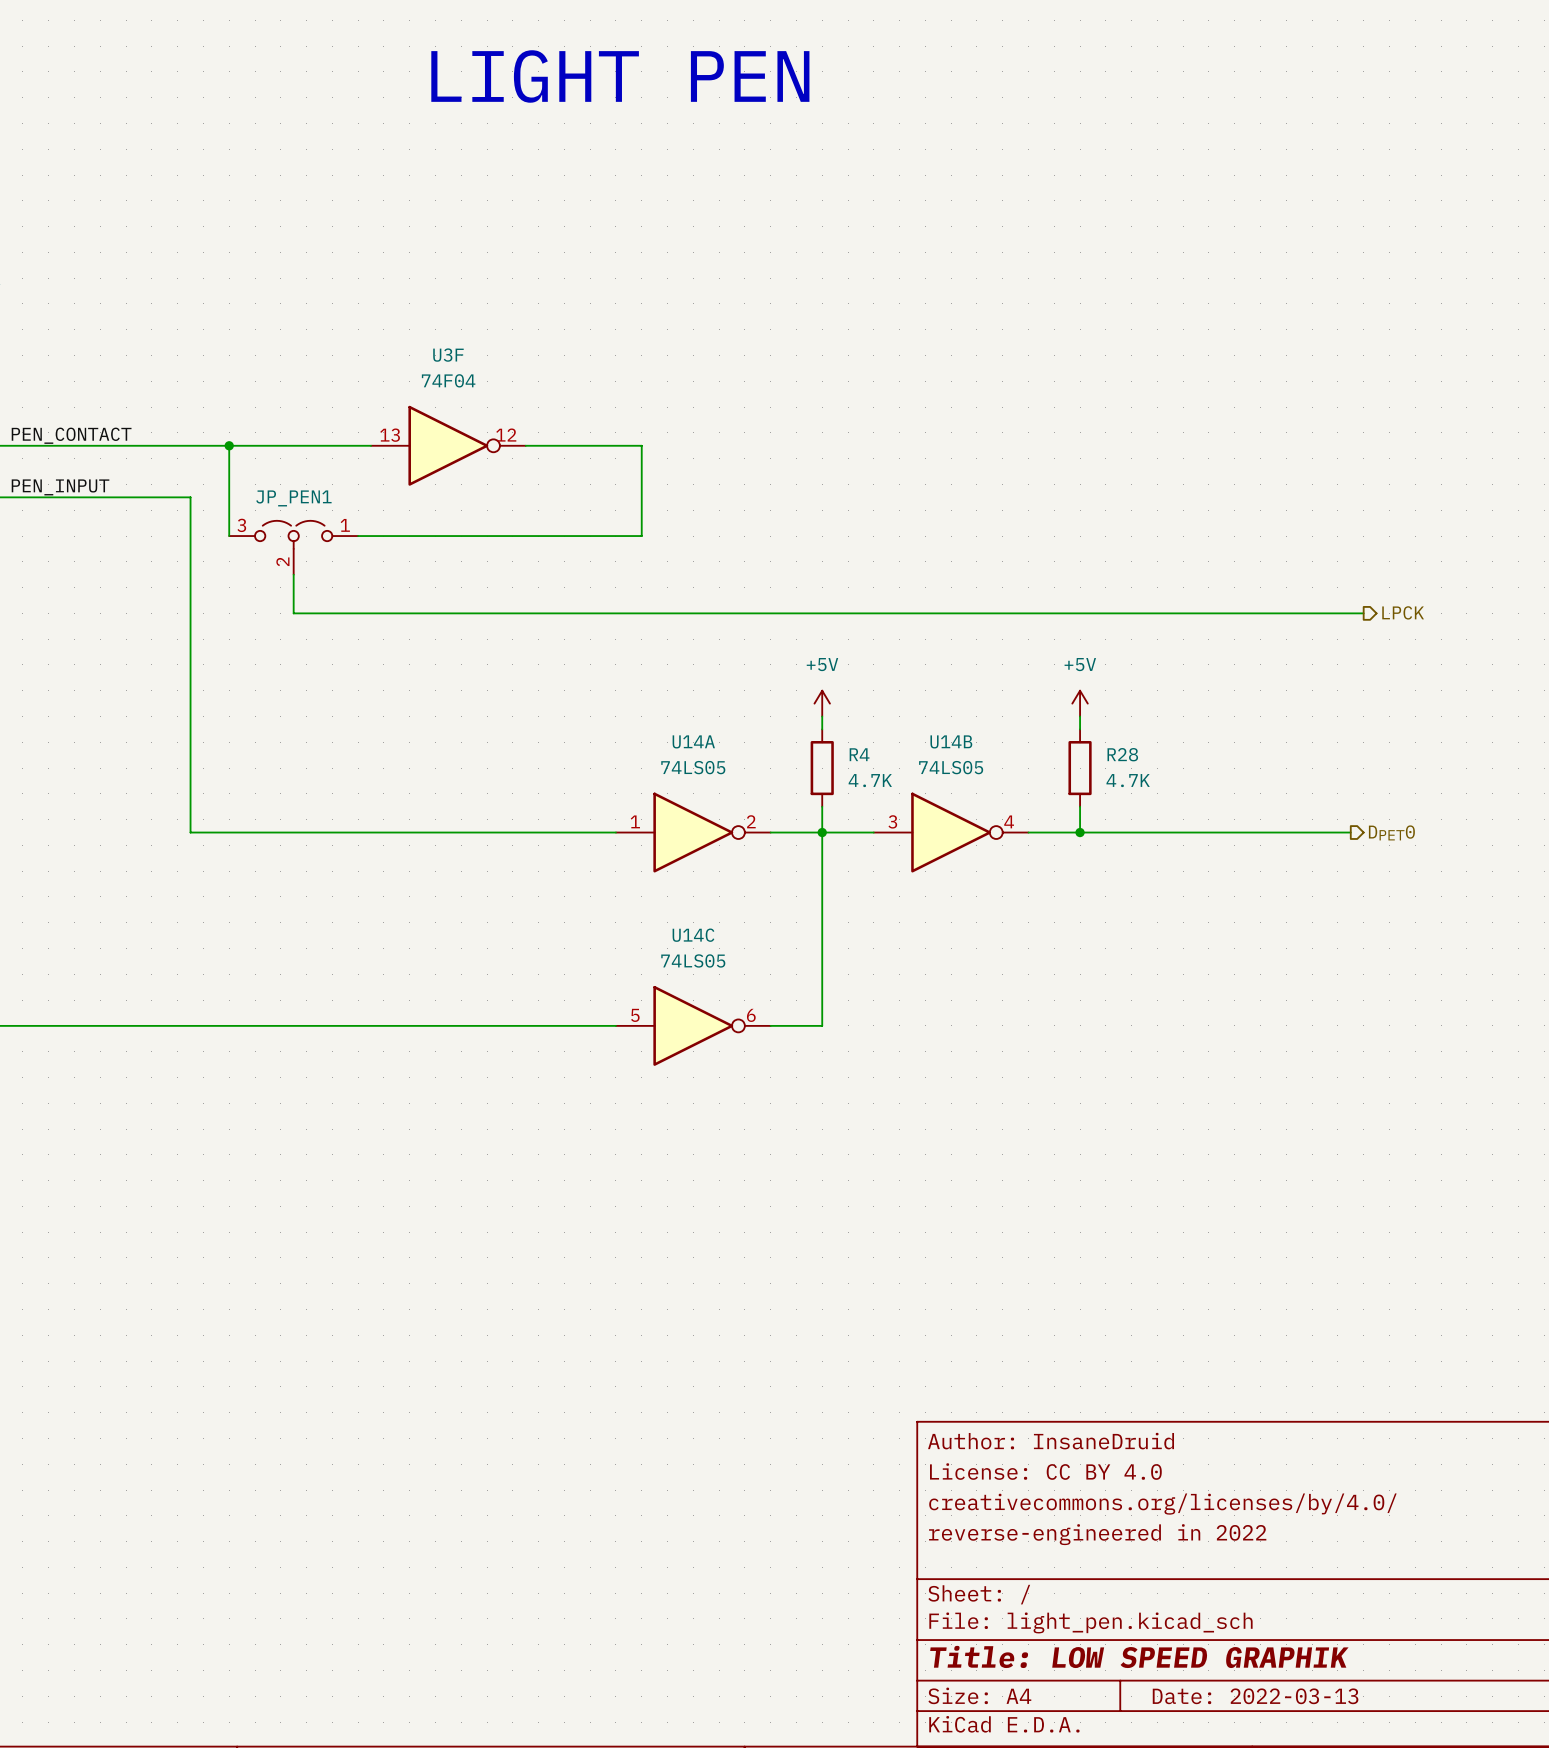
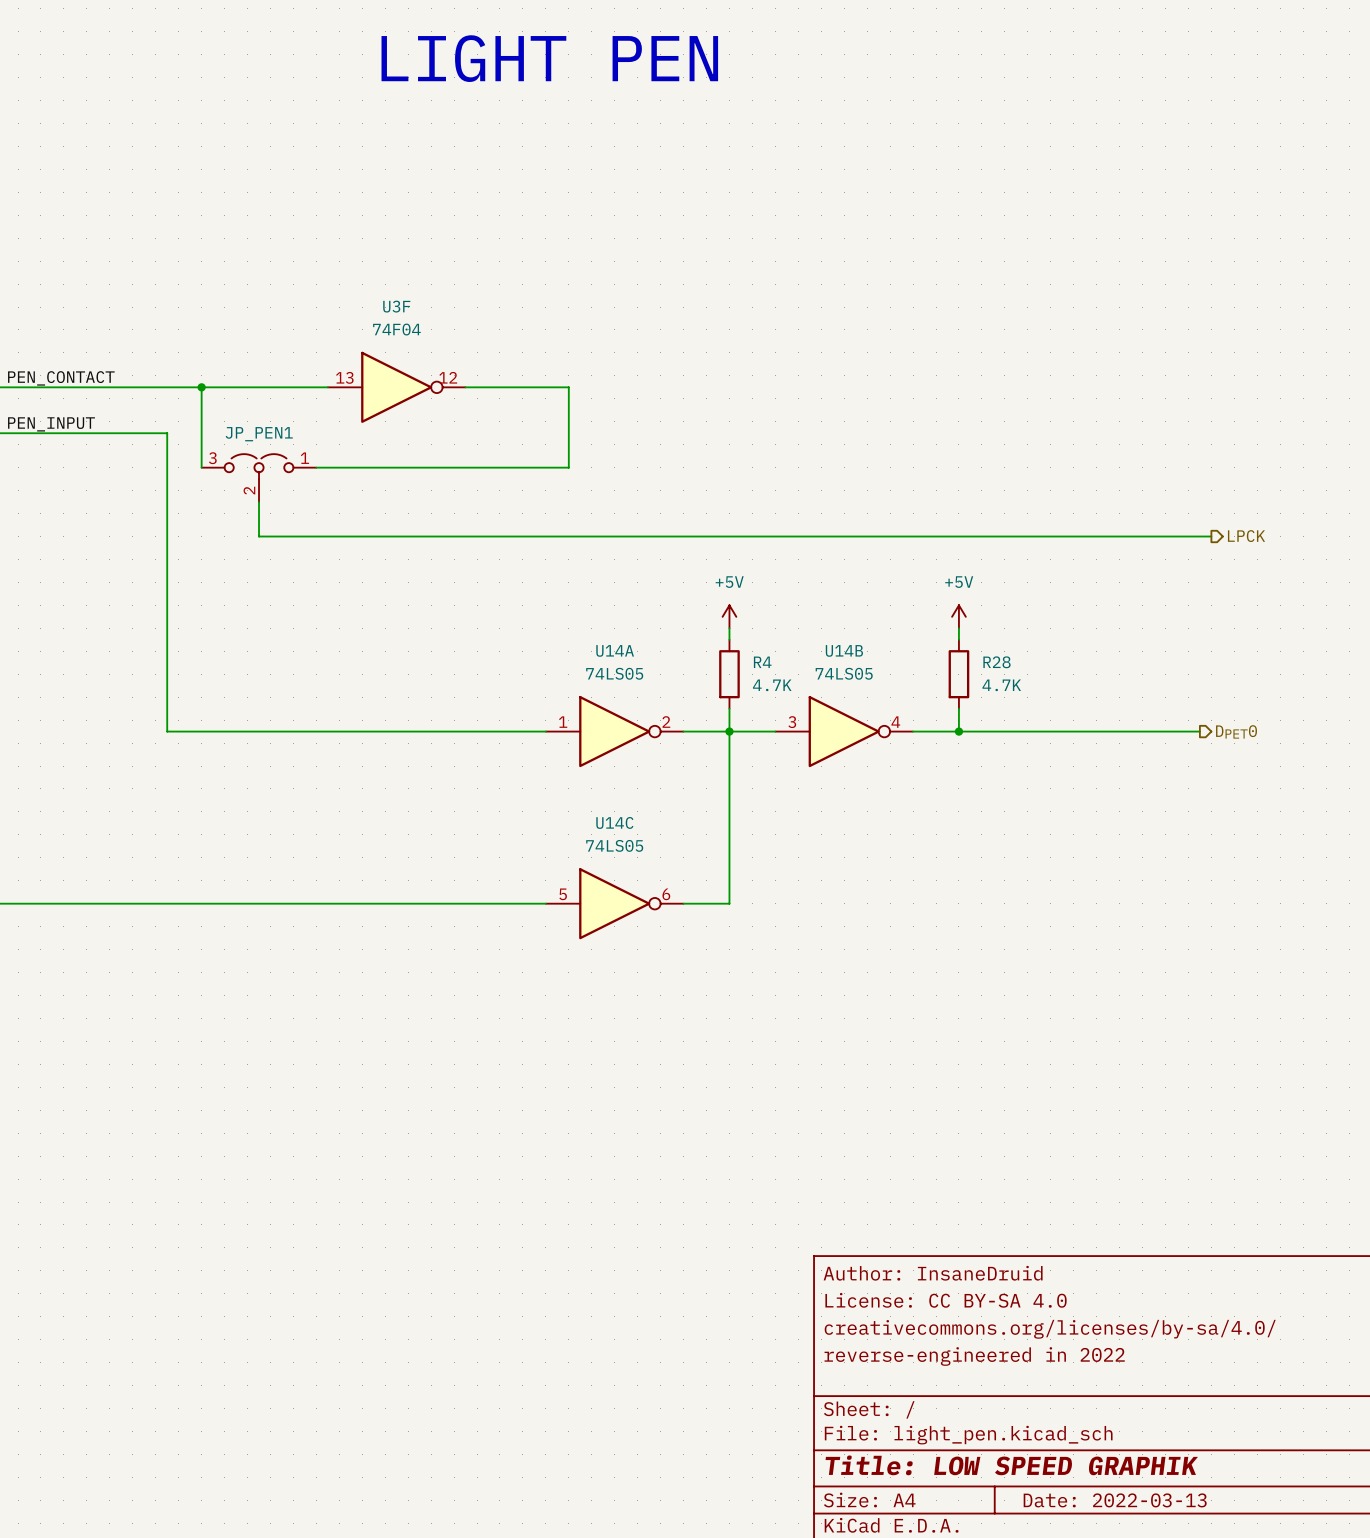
title block: License: CC BY 4.0 (1045, 1471) -> License: CC BY-SA 4.0 (946, 1300)
title block: creativecommons.org/licenses/by/4.0/ (1162, 1504) -> creativecommons.org/licenses/by-sa/4.0/ (1050, 1329)

